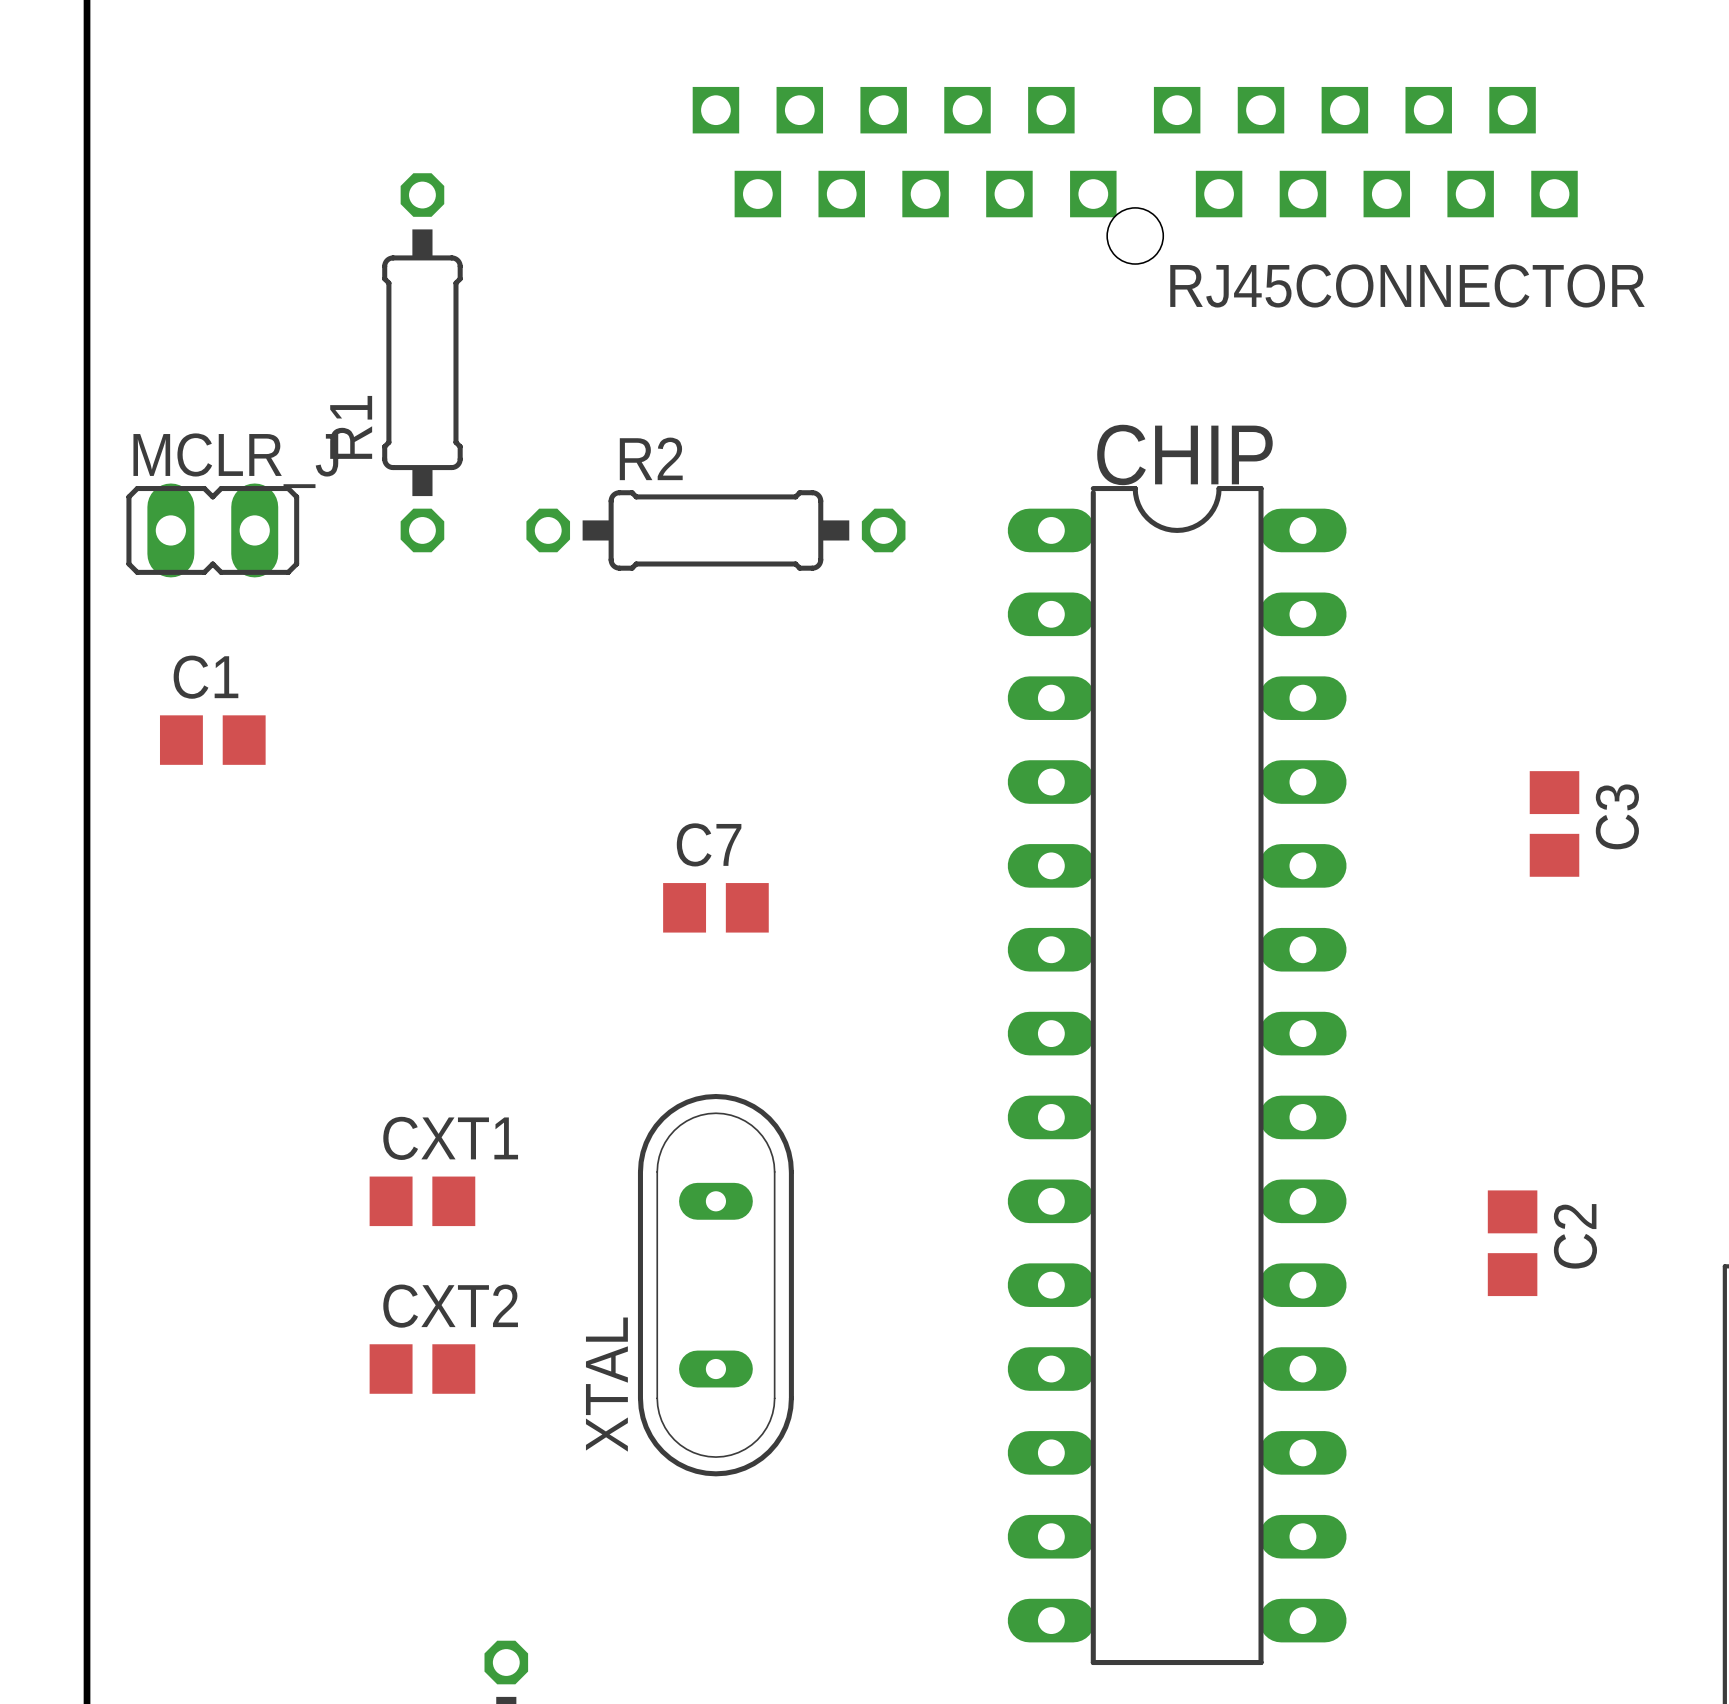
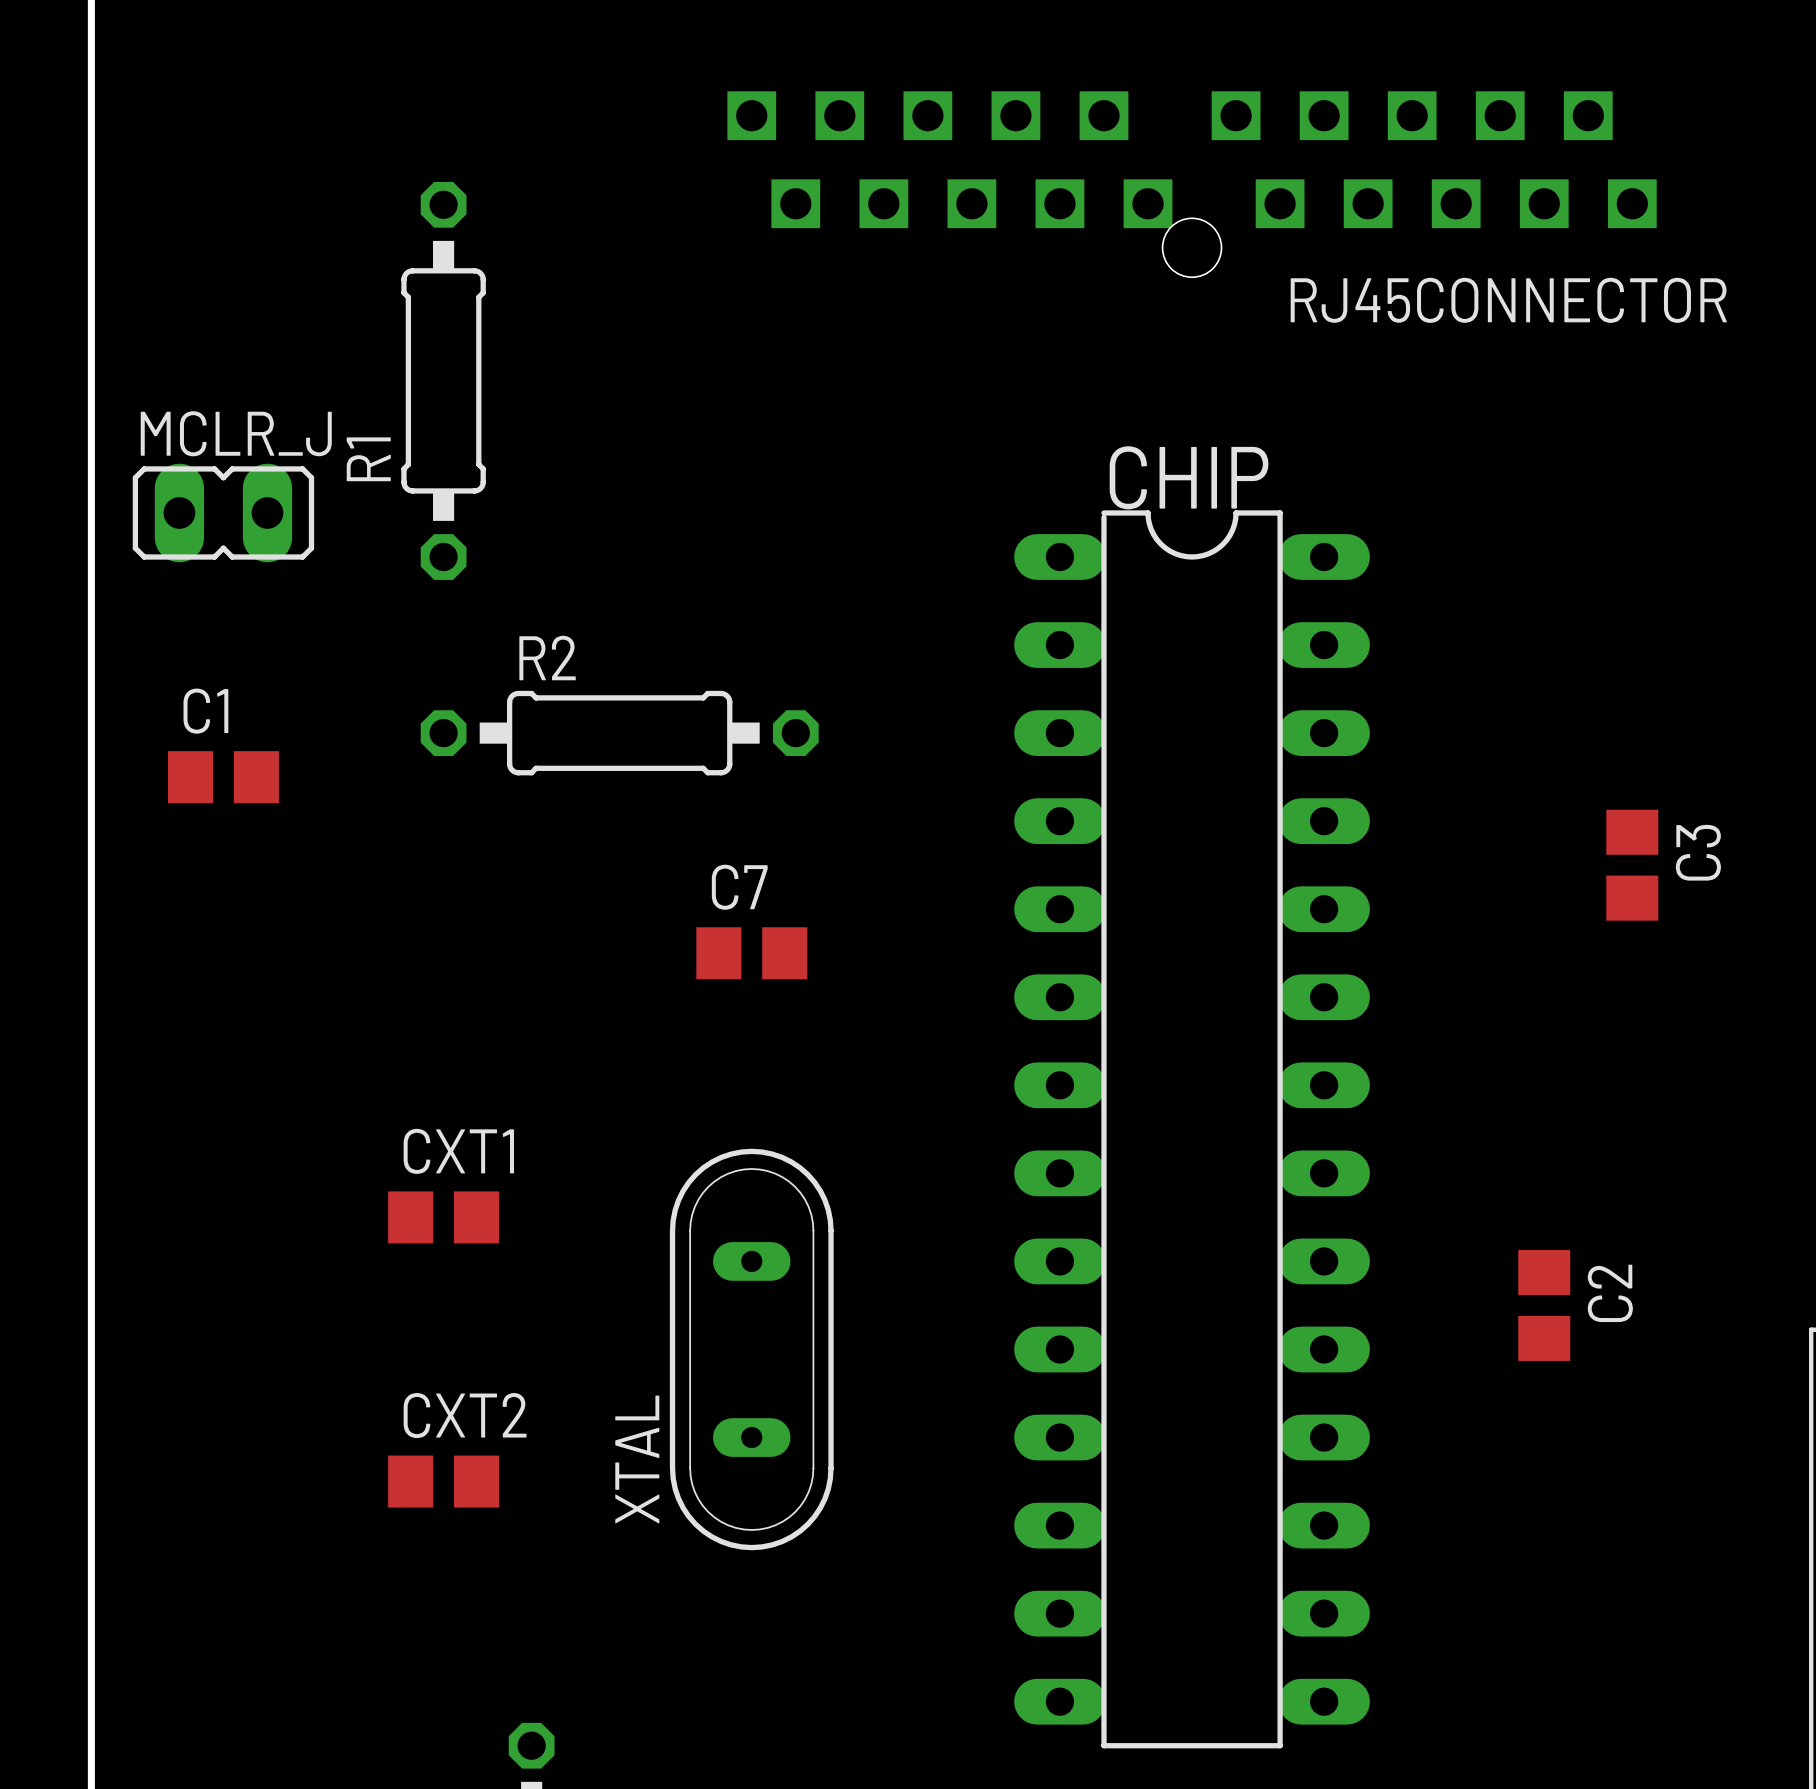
MCLR_J position: (212, 530) -> (223, 512)
R2 position: (715, 530) -> (619, 733)
CHIP position: (1177, 1075) -> (1192, 1129)
CXT1 position: (422, 1201) -> (443, 1217)
C2 position: (1512, 1243) -> (1544, 1305)
CXT2 position: (422, 1369) -> (443, 1481)

